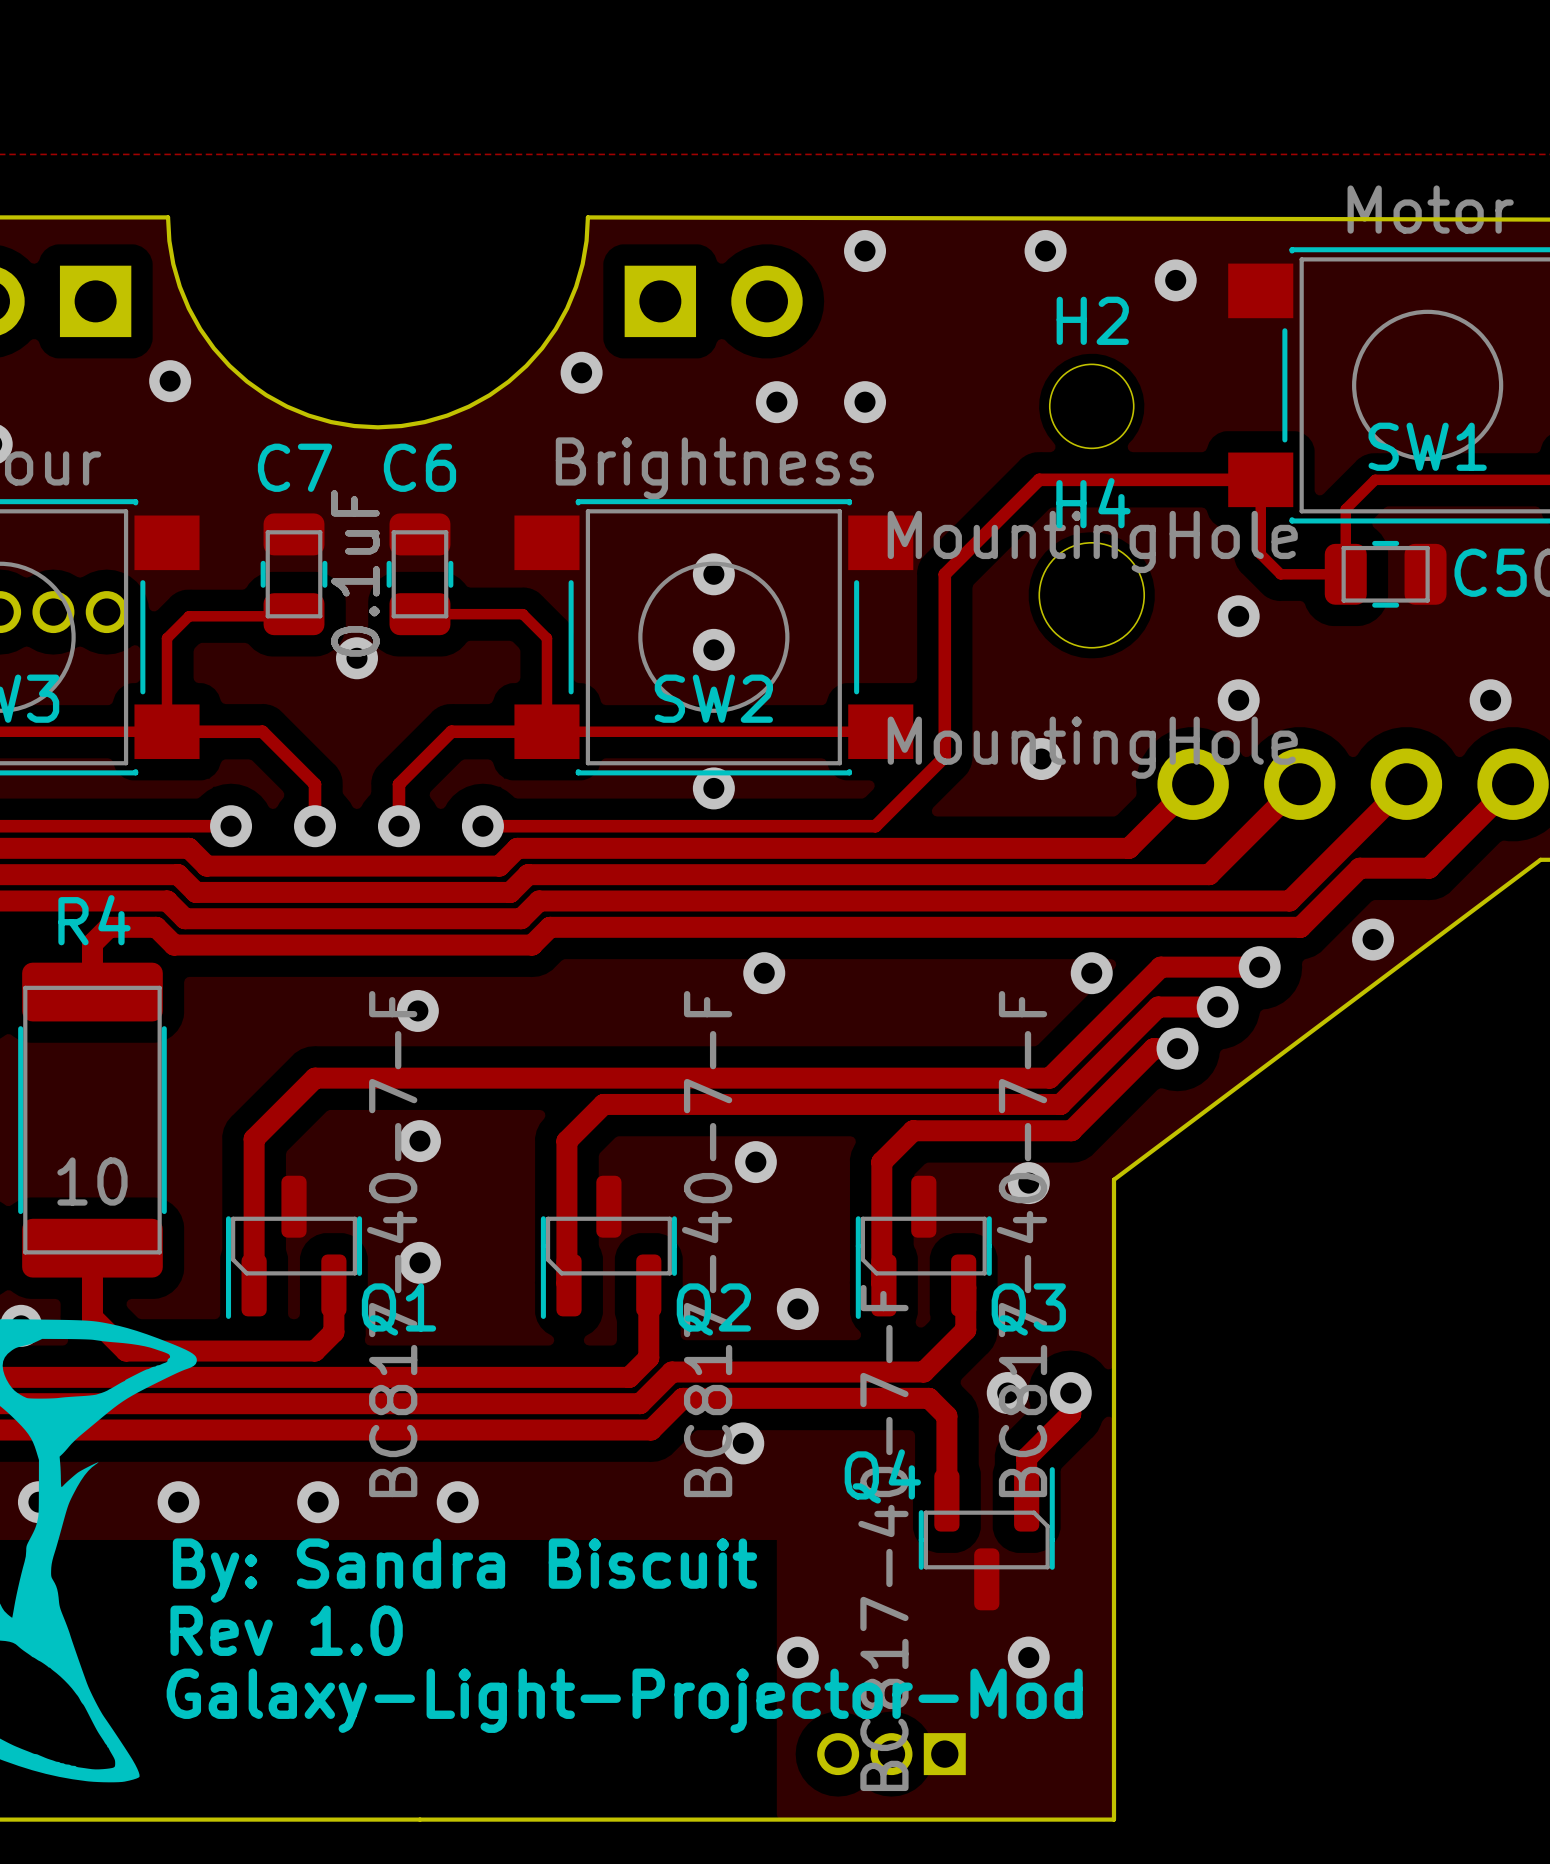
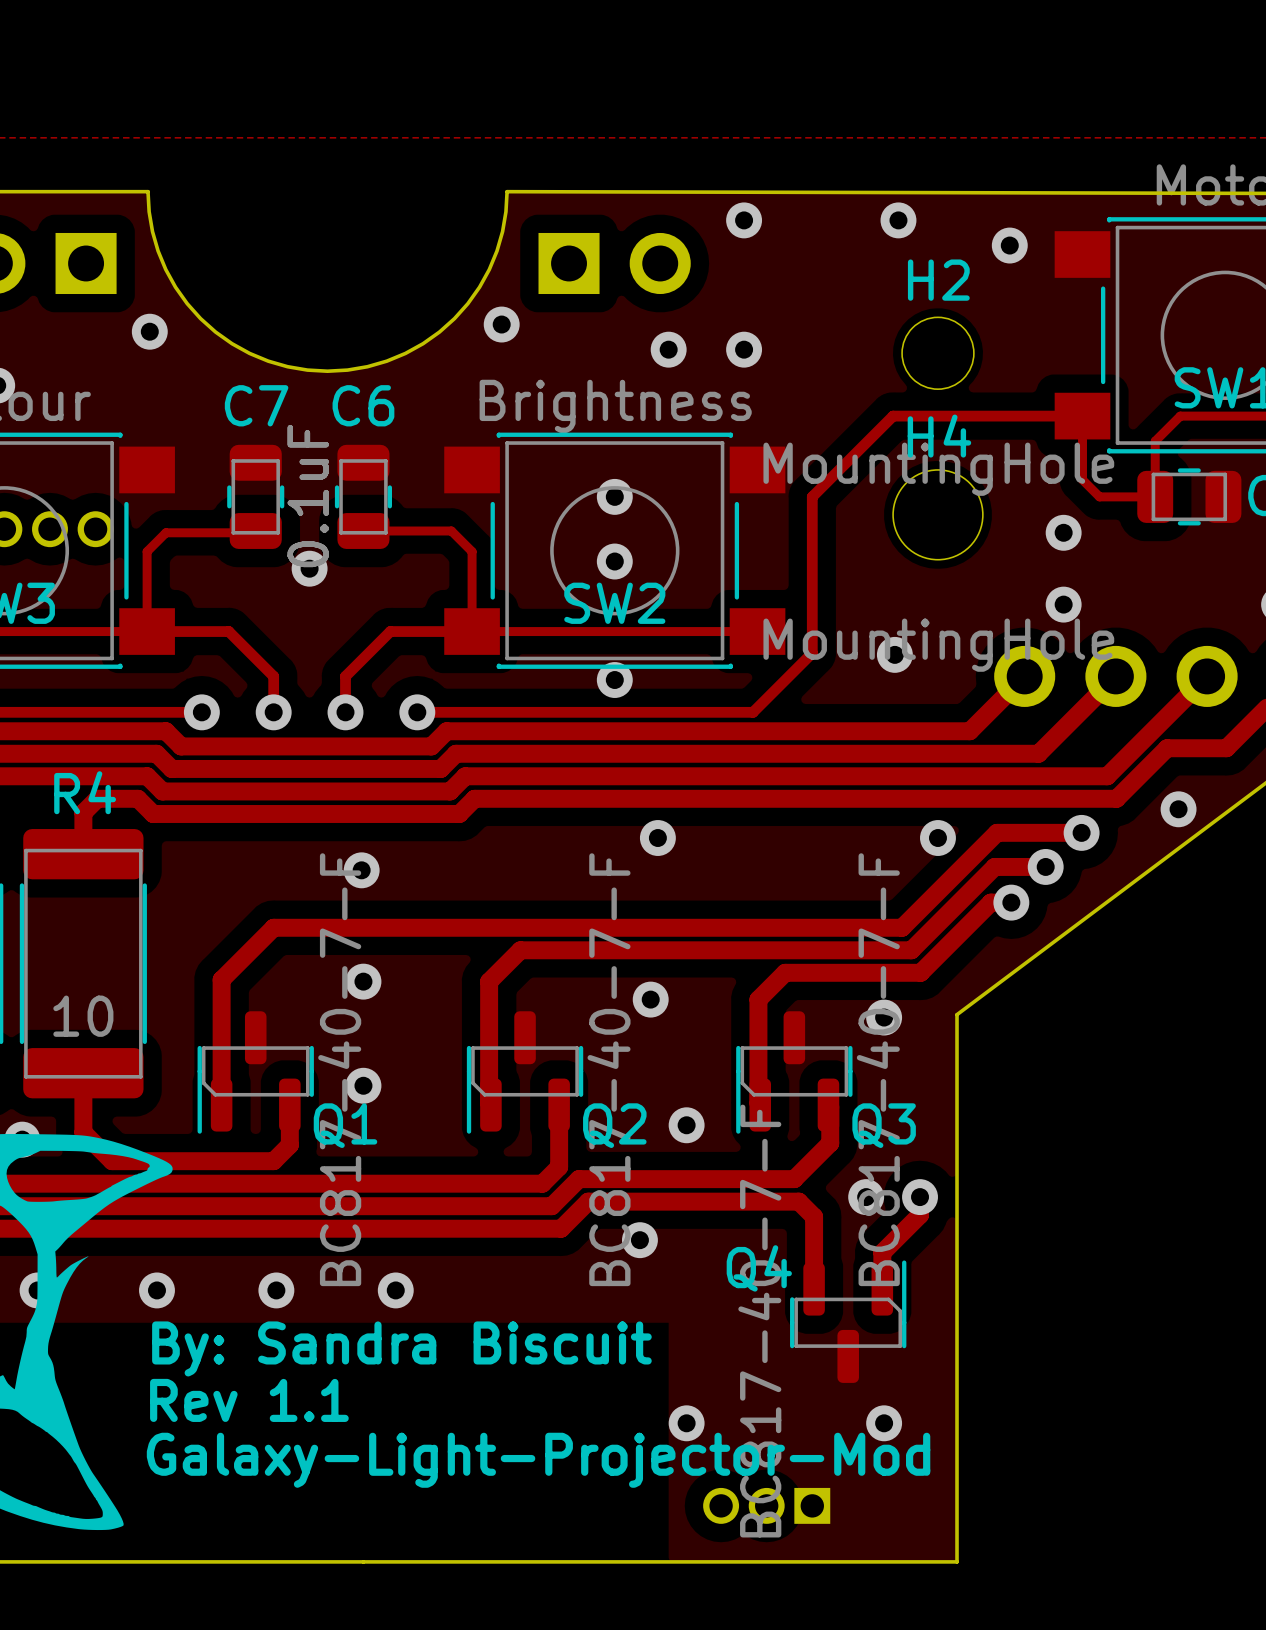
text: Rev 1.0 (286, 1630) -> Rev 1.1 (249, 1400)

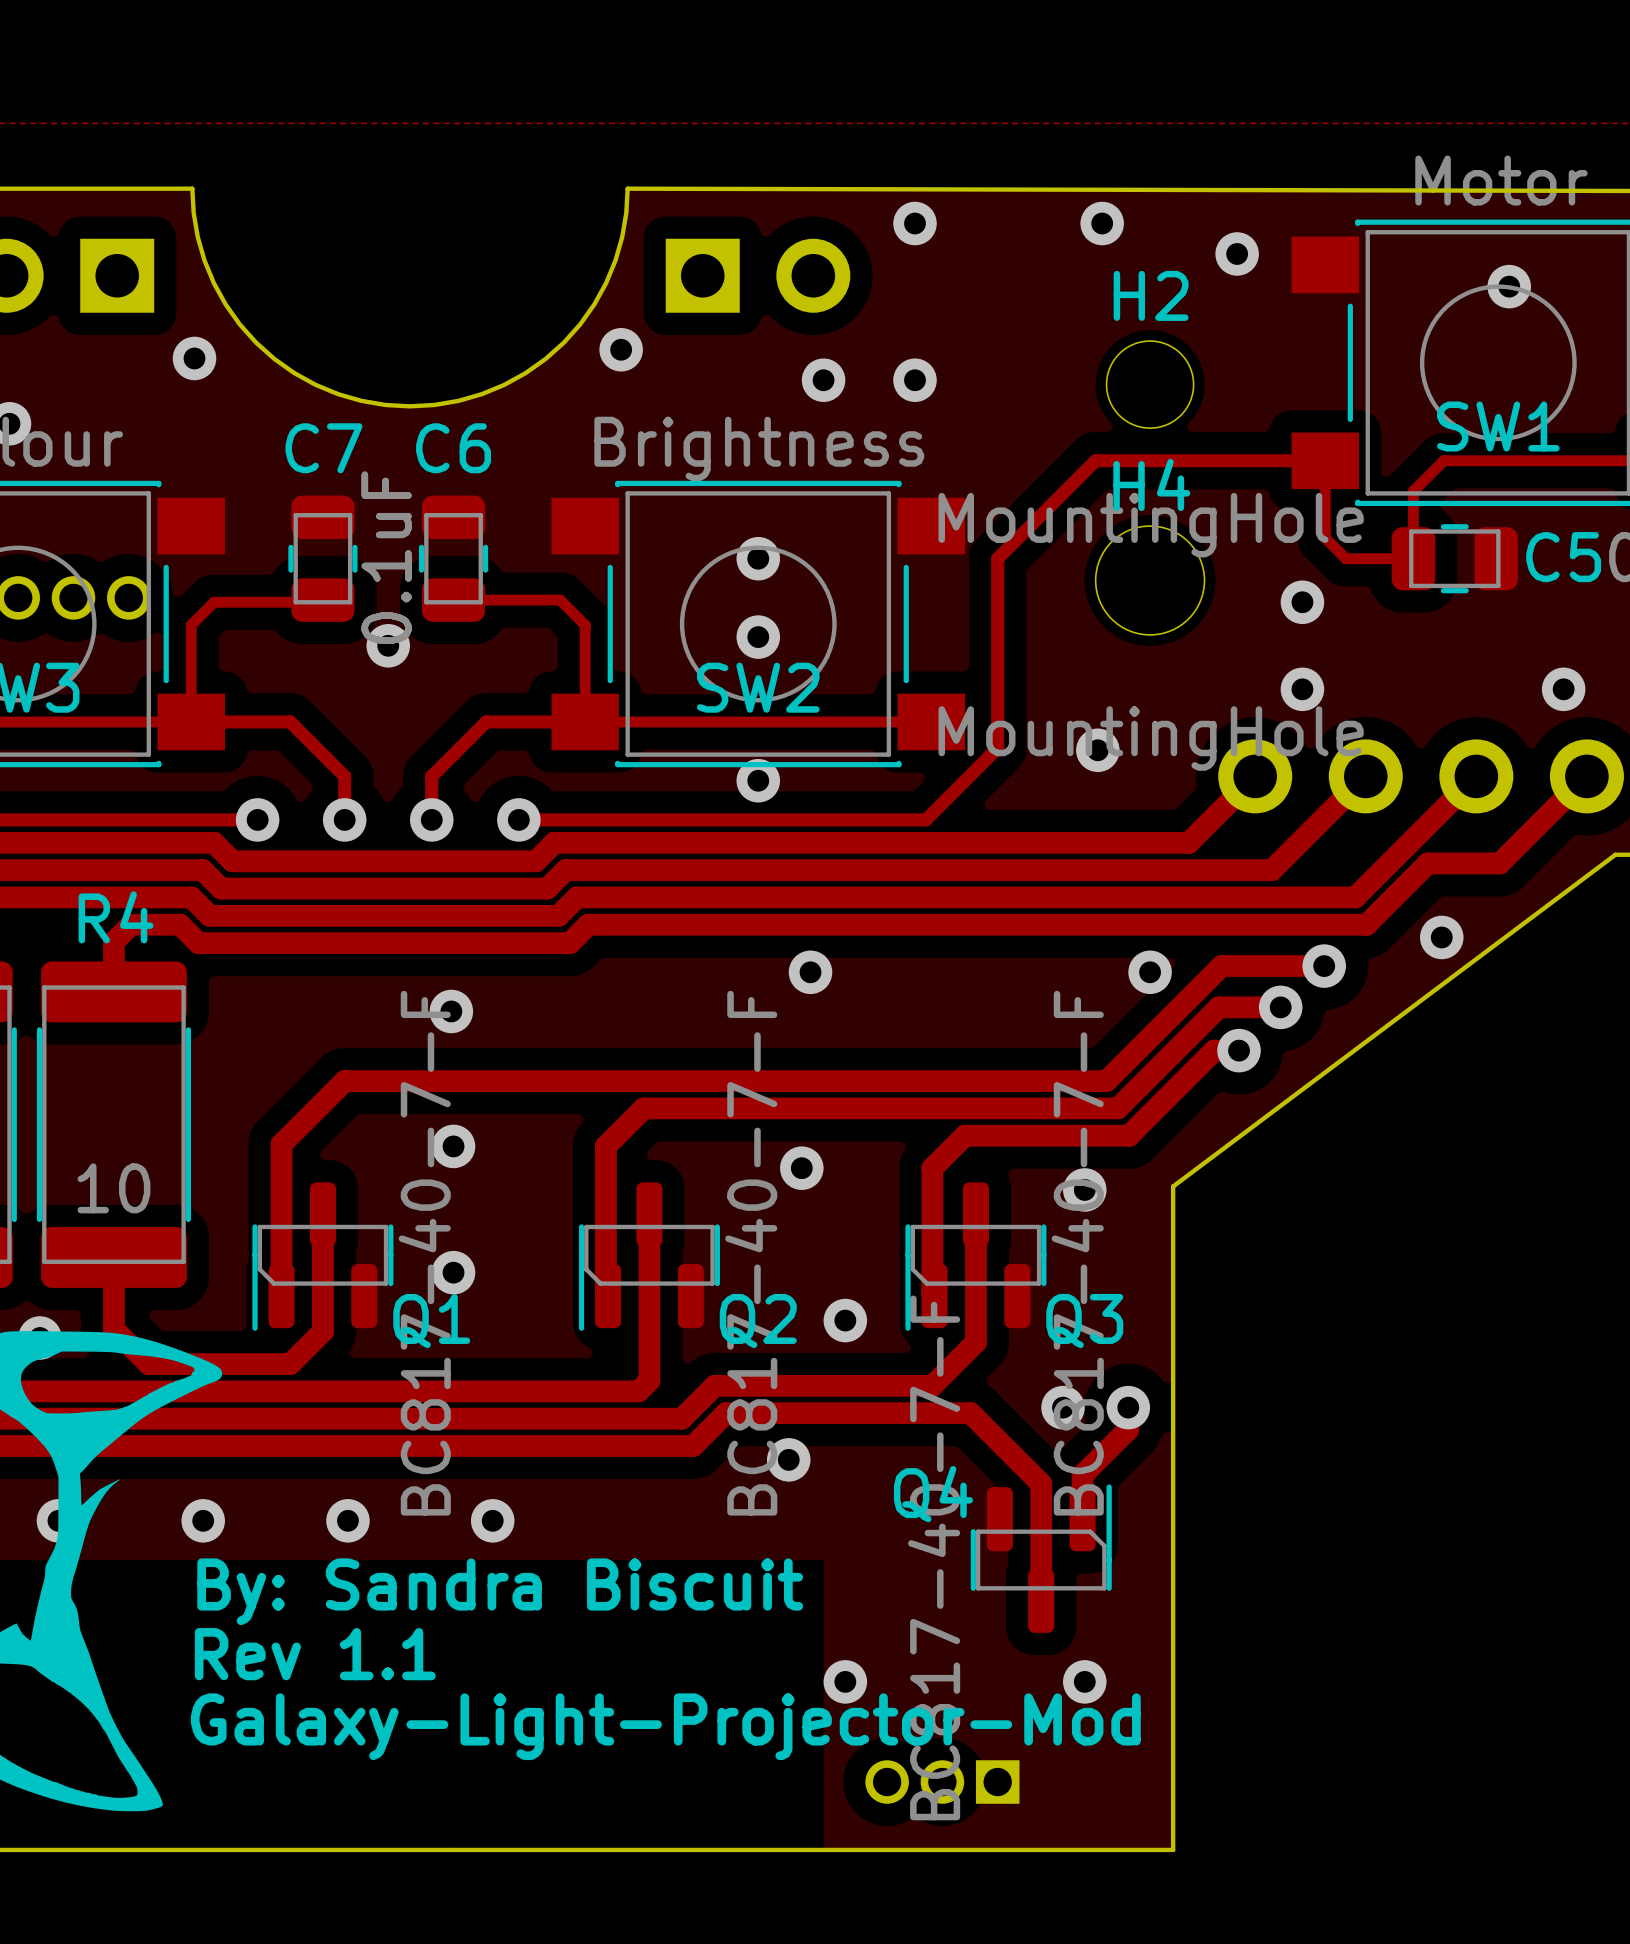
via: none -> (1509, 286)
track: (289, 1105) (289, 1145) (273, 1161) (228, 1161) -> (322, 1214) (322, 1331) (290, 1364)
track: (559, 1105) (559, 1167) (542, 1183) (516, 1183) -> (649, 1214) (649, 1380) (638, 1391)
track: (830, 1106) (830, 1143) (794, 1179) (758, 1179) -> (975, 1214) (975, 1342) (932, 1385)
track: (789, 1201) (798, 1201) (814, 1216) (814, 1289) -> (970, 1413) (1041, 1483) (1041, 1600)

